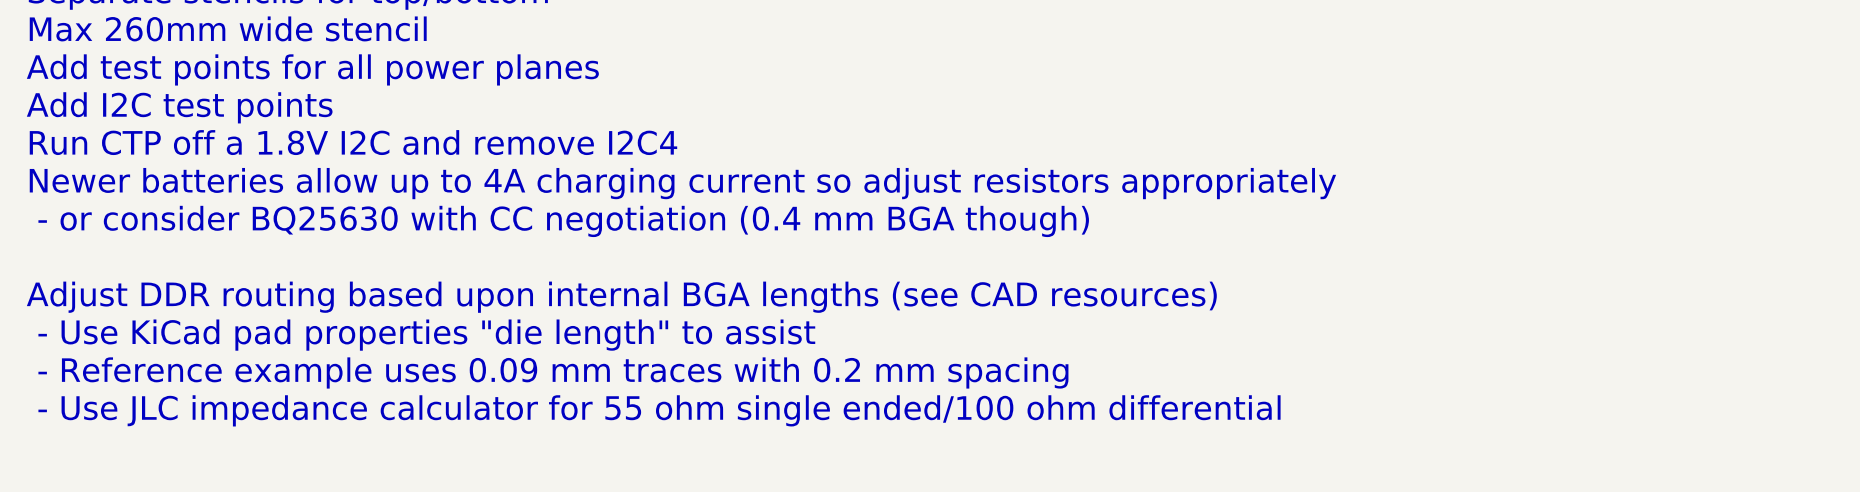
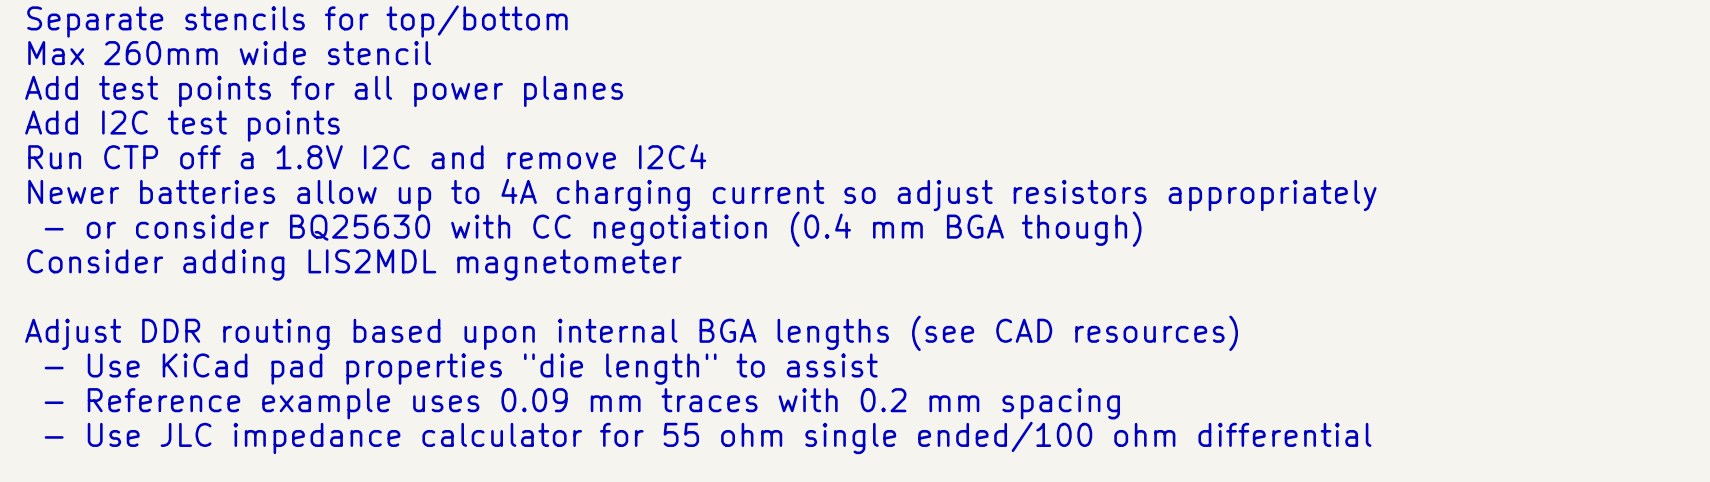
text: none -> Consider adding LIS2MDL magnetometer (354, 264)
text: Adjust DDR routing based upon internal BGA lengths (see CAD resources) (621, 297) -> none
text: - Use KiCad pad properties "die length" to assist (426, 335) -> Adjust DDR routing based upon internal BGA lengths (see CAD resources) (631, 333)
text: - Reference example uses 0.09 mm traces with 0.2 mm spacing (553, 372) -> - Use KiCad pad properties "die length" to assist (461, 369)
text: - Use JLC impedance calculator for 55 ohm single ended/100 ohm differential (659, 410) -> - Reference example uses 0.09 mm traces with 0.2 mm spacing (582, 403)
text: none -> - Use JLC impedance calculator for 55 ohm single ended/100 ohm differential (708, 437)

